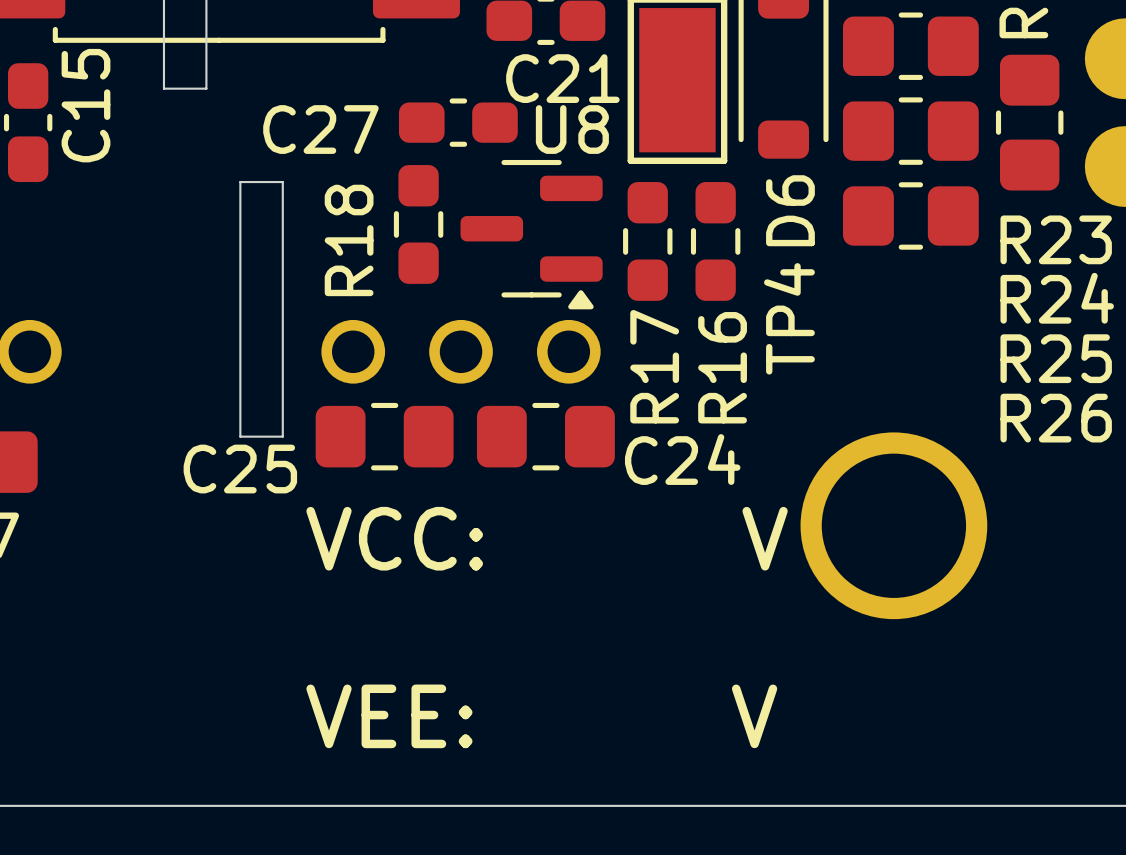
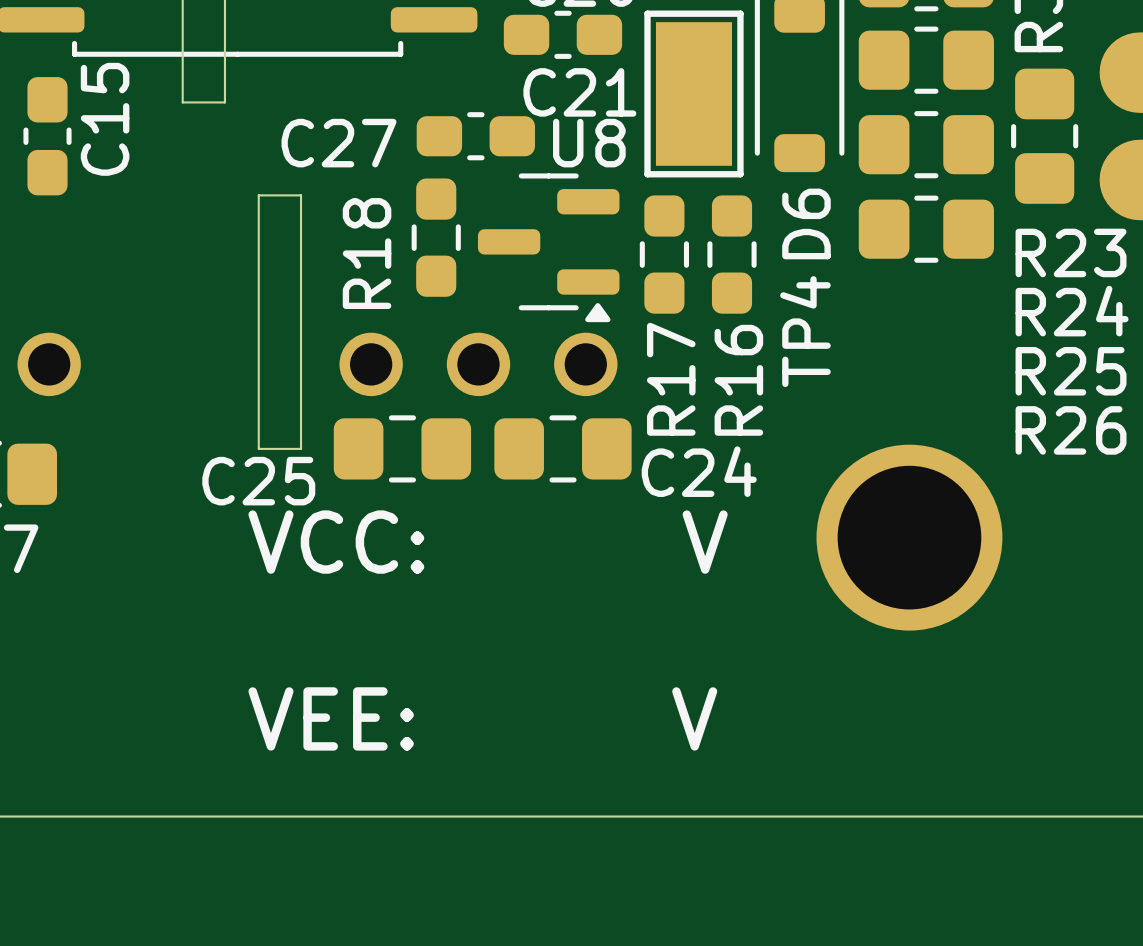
text position: VCC: V (547, 538) -> VCC: V (488, 542)
text position: VEE: V (541, 716) -> VEE: V (482, 718)

